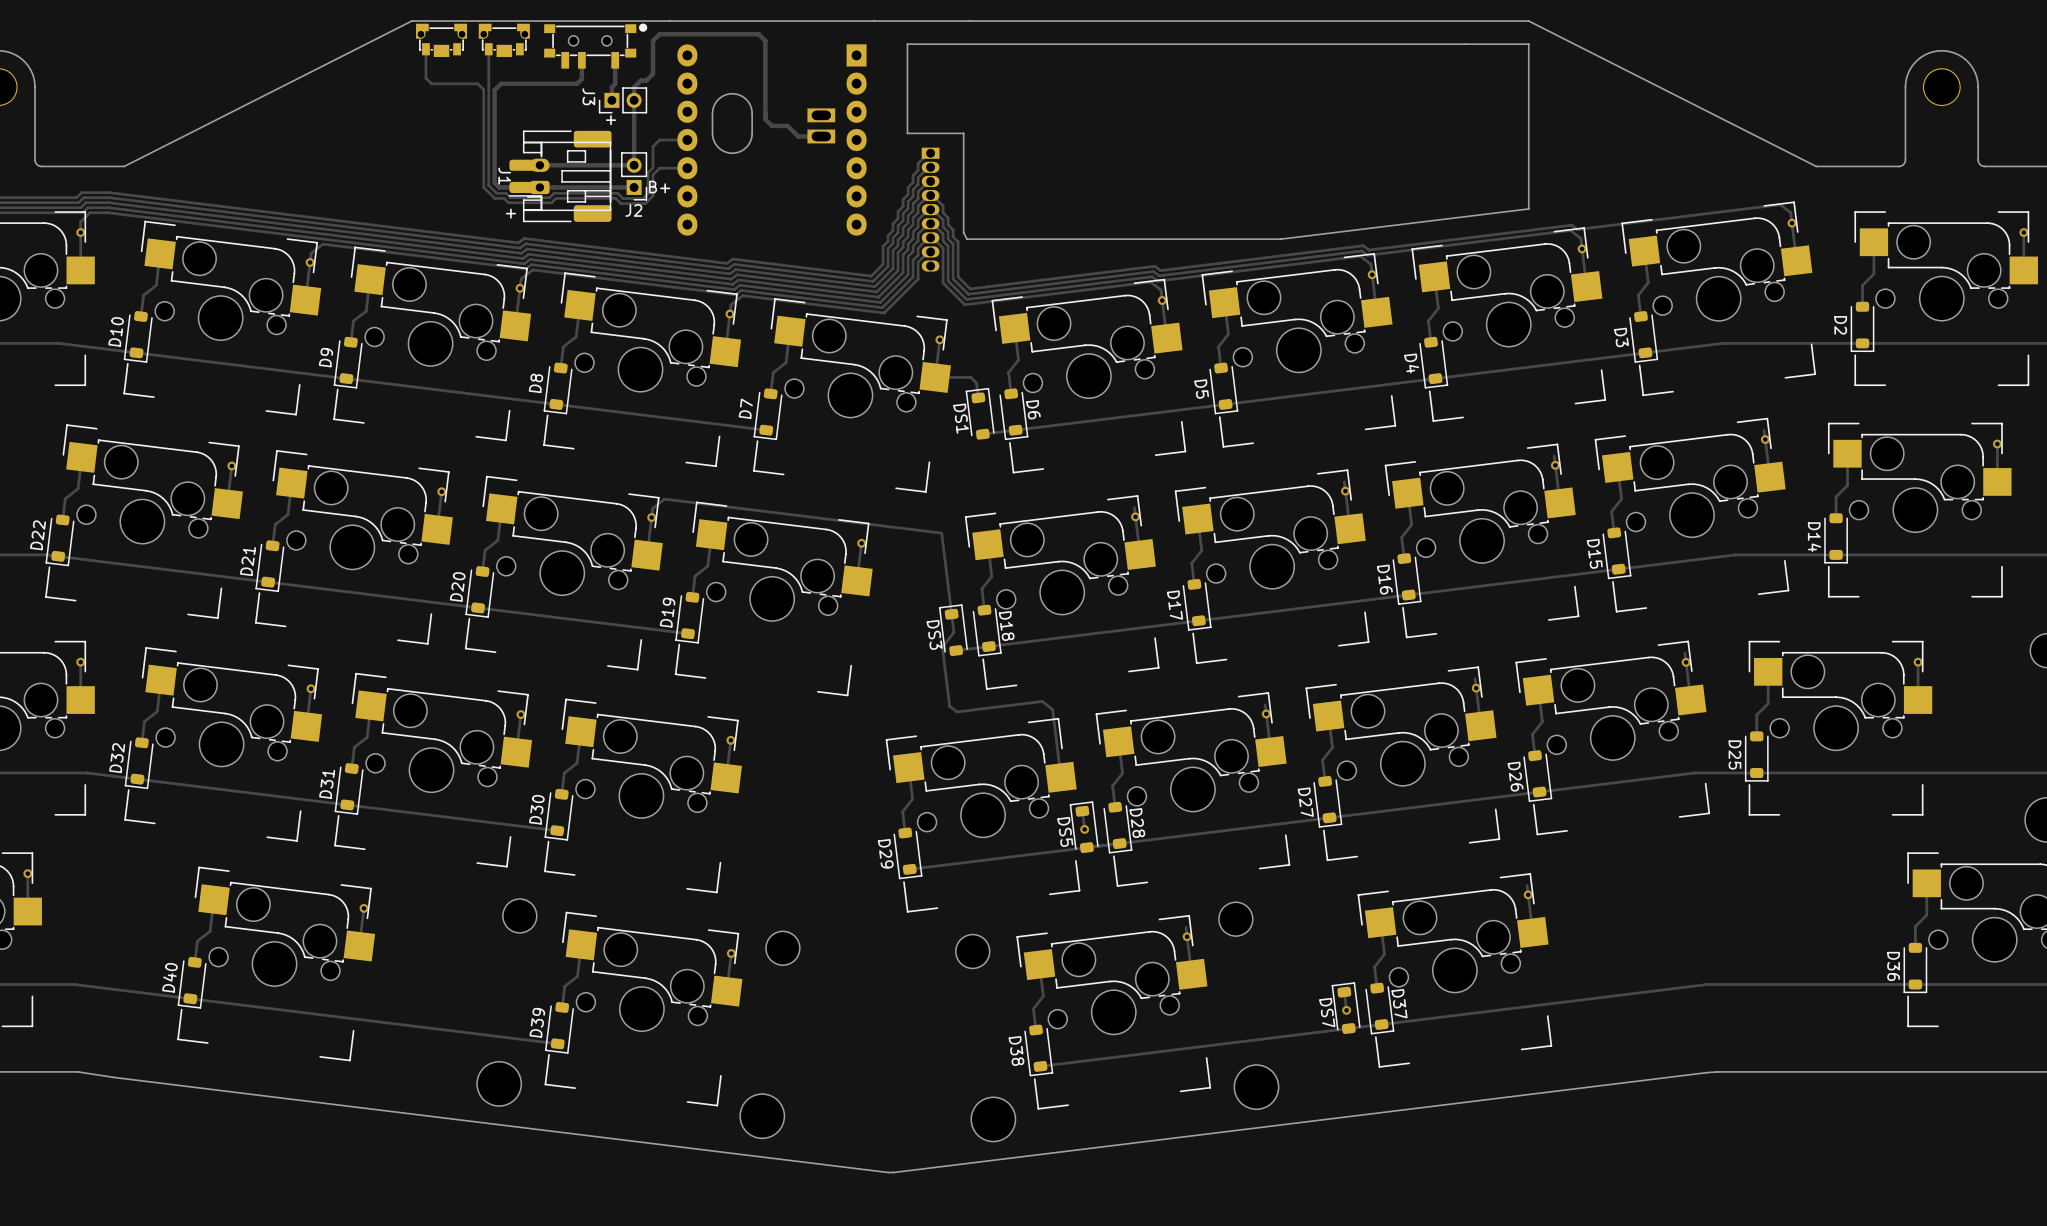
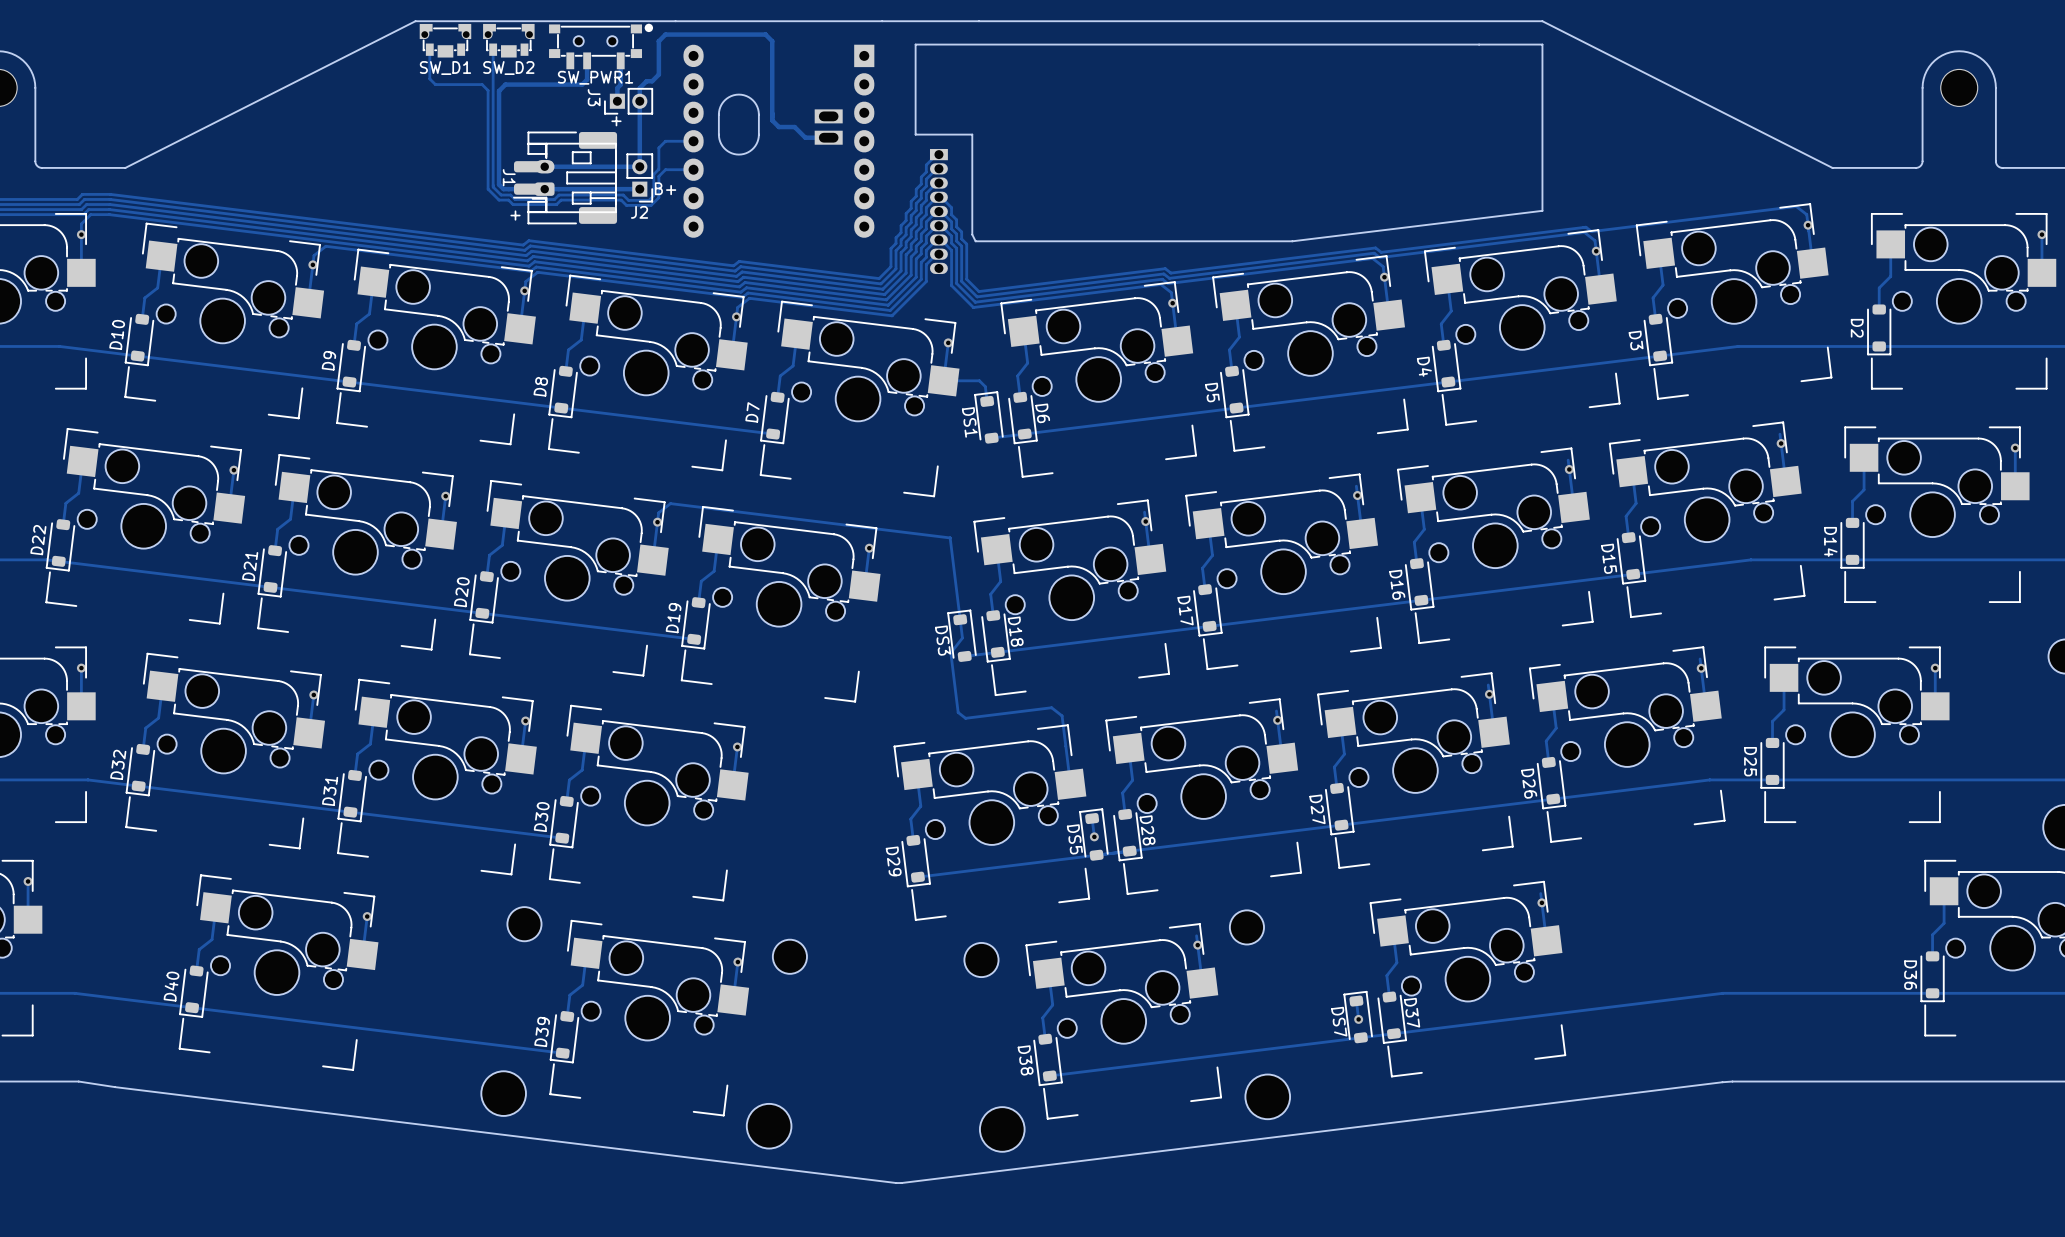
SW_D1 name: none -> SW_D1 (445, 68)
SW_D2 name: none -> SW_D2 (508, 68)
SW_PWR1 name: none -> SW_PWR1 (595, 77)

